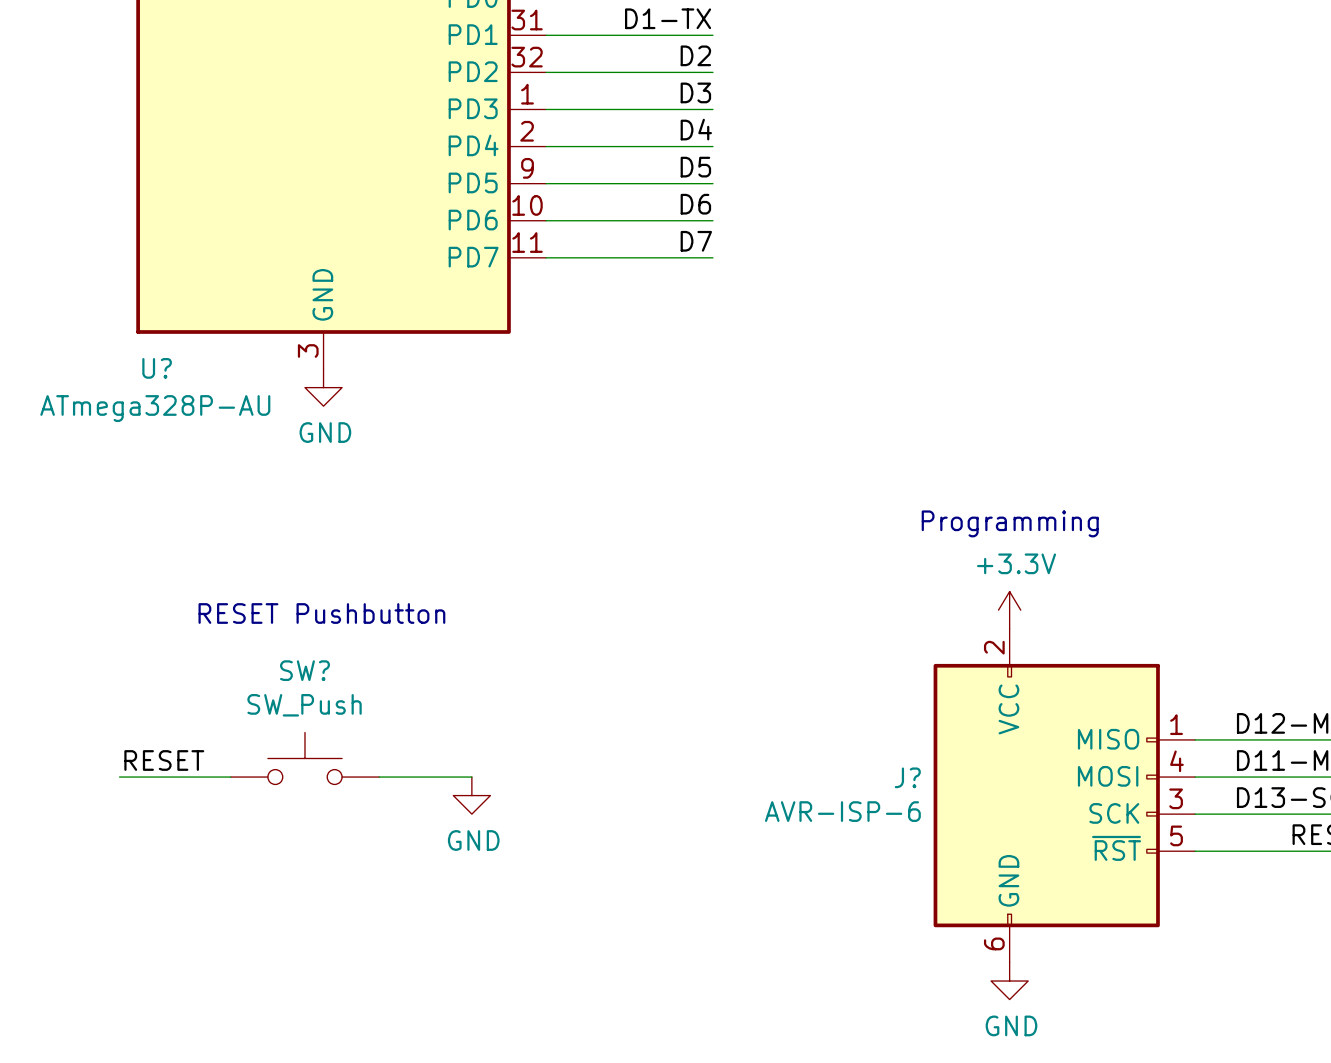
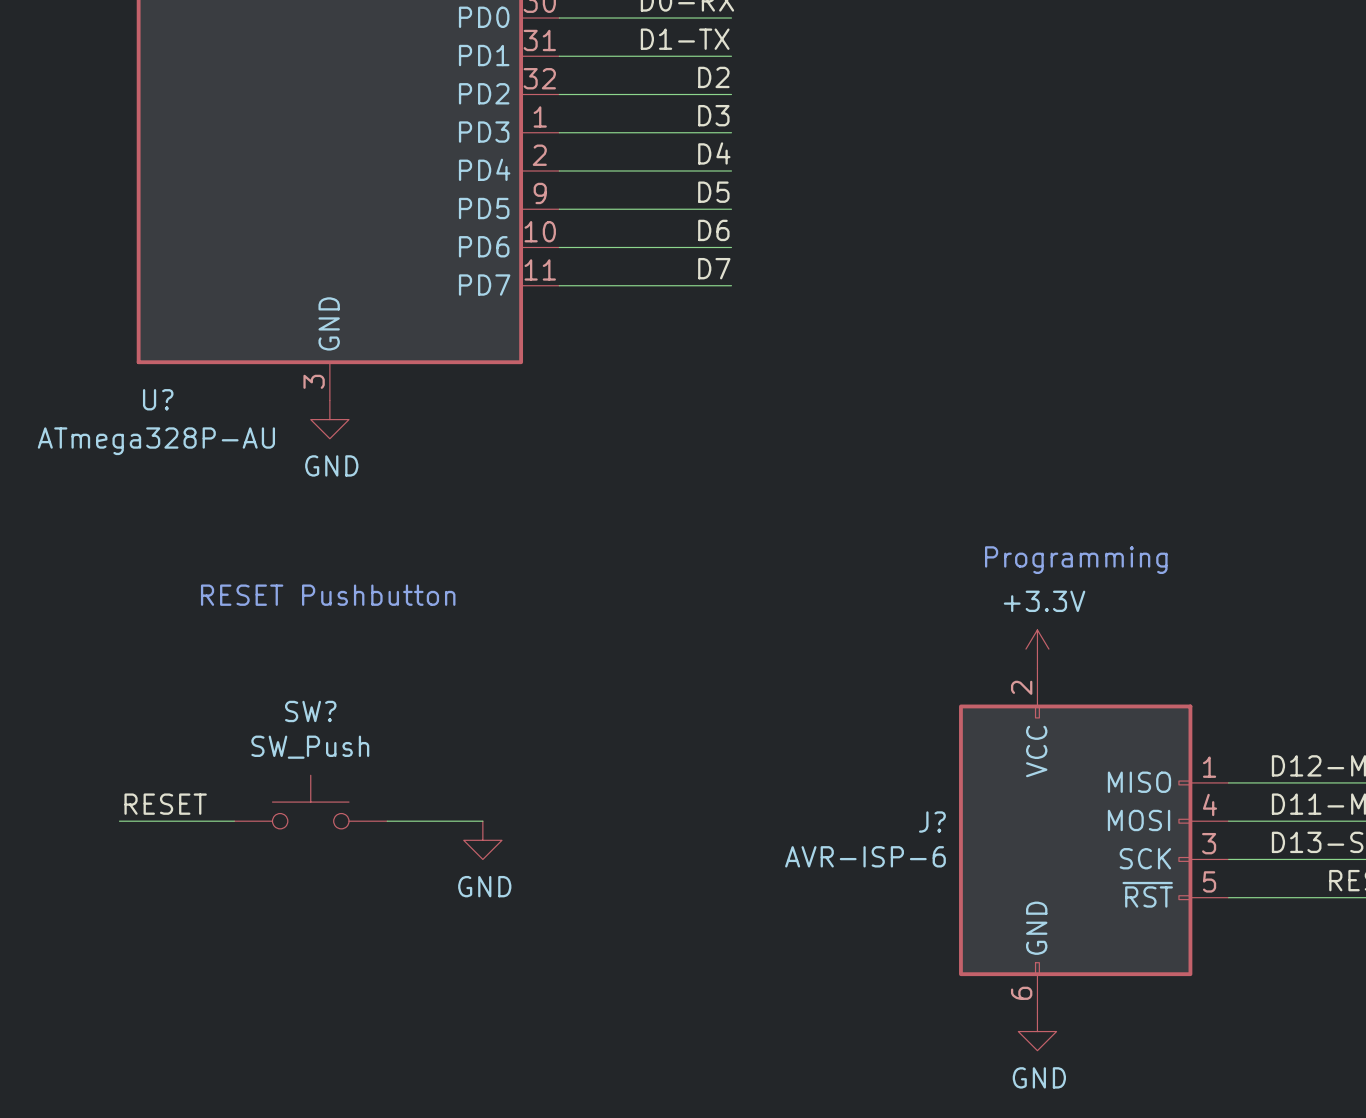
text position: Programming (1010, 523) -> Programming (1076, 560)
text position: RESET Pushbutton (321, 613) -> RESET Pushbutton (328, 595)

